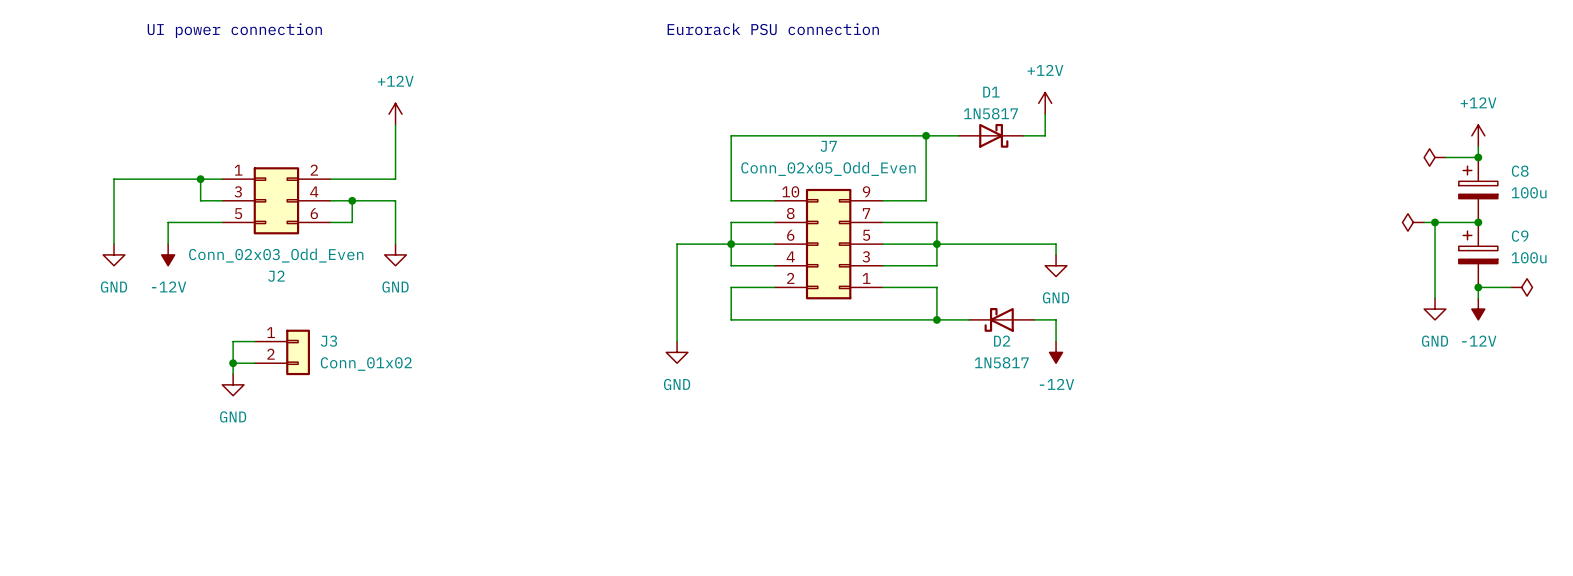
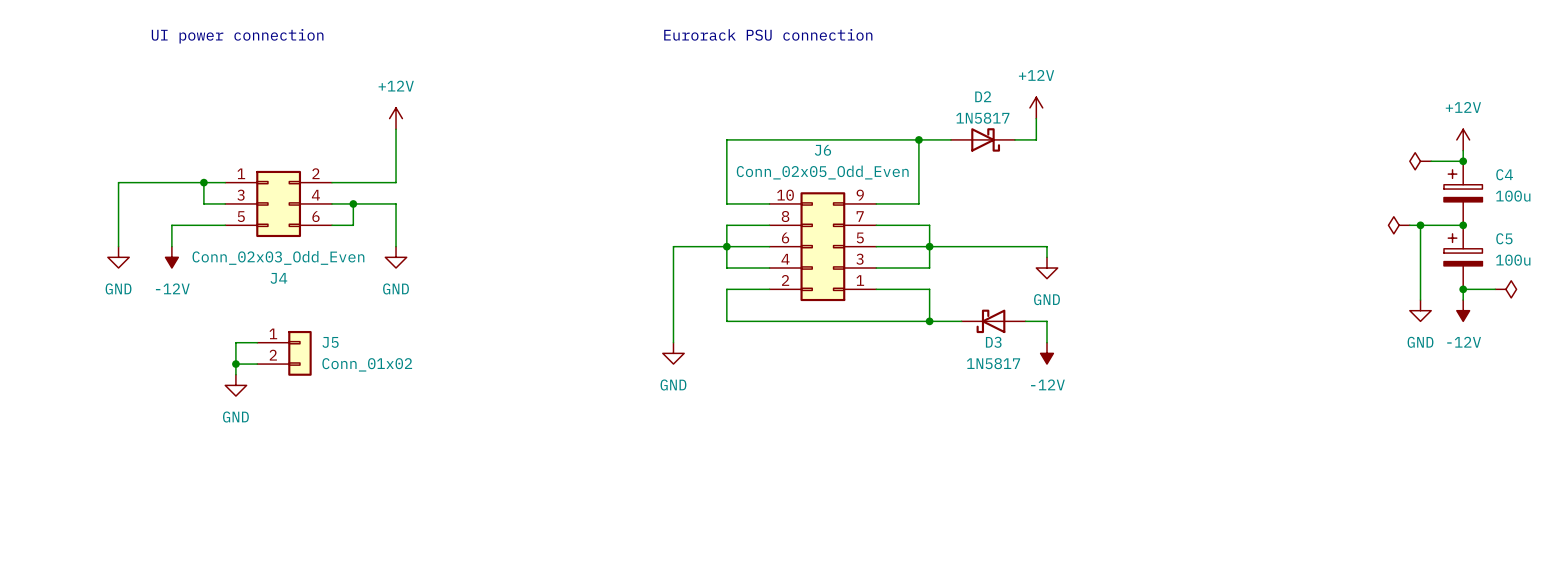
D1 name: D1 (991, 92) -> D2 (983, 96)
J7 name: J7 (828, 146) -> J6 (822, 150)
C8 name: C8 (1520, 171) -> C4 (1504, 174)
C9 name: C9 (1520, 236) -> C5 (1504, 238)
J2 name: J2 (276, 276) -> J4 (278, 278)
J3 name: J3 (328, 341) -> J5 (330, 342)
D2 name: D2 (1002, 341) -> D3 (993, 342)

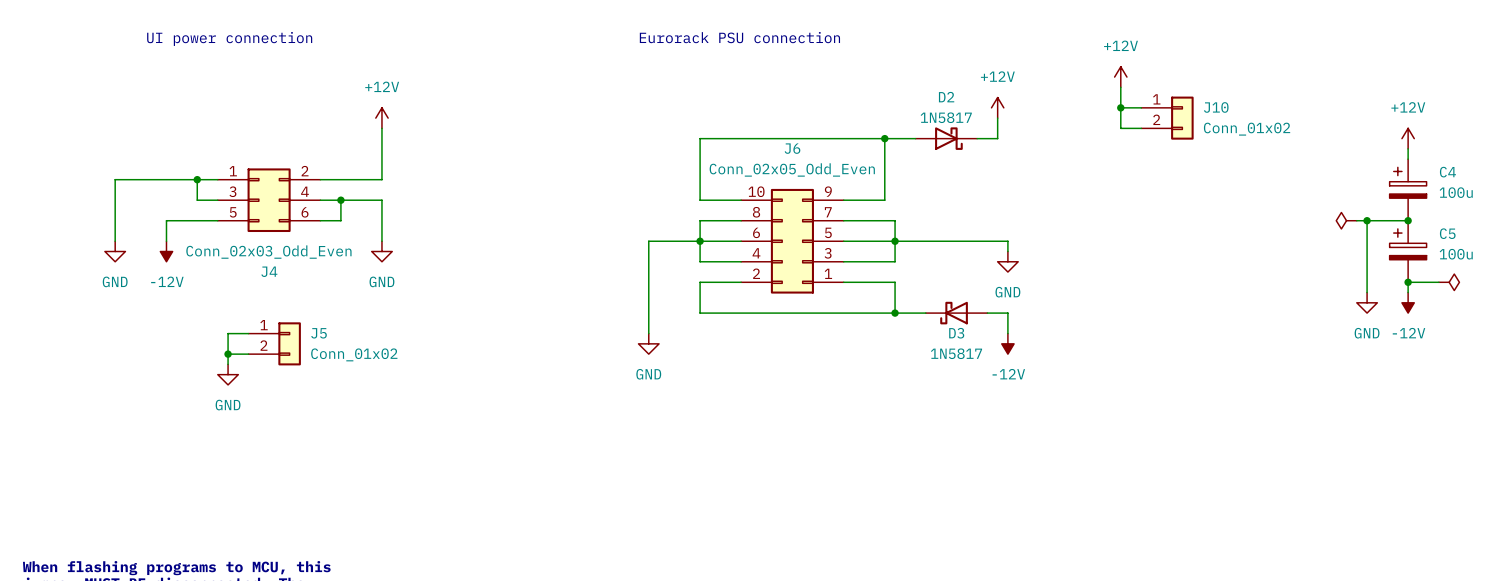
power symbol: none -> +12V (1120, 77)
wire: none -> (1120, 87) (1120, 128) (1141, 128)
wire: none -> (1120, 107) (1141, 107)
junction: none -> (1120, 107)
J10: none -> Conn_01x02 (1167, 118)
power symbol: (1420, 161) -> none
wire: (1431, 161) (1463, 161) -> none
junction: (1463, 161) -> none

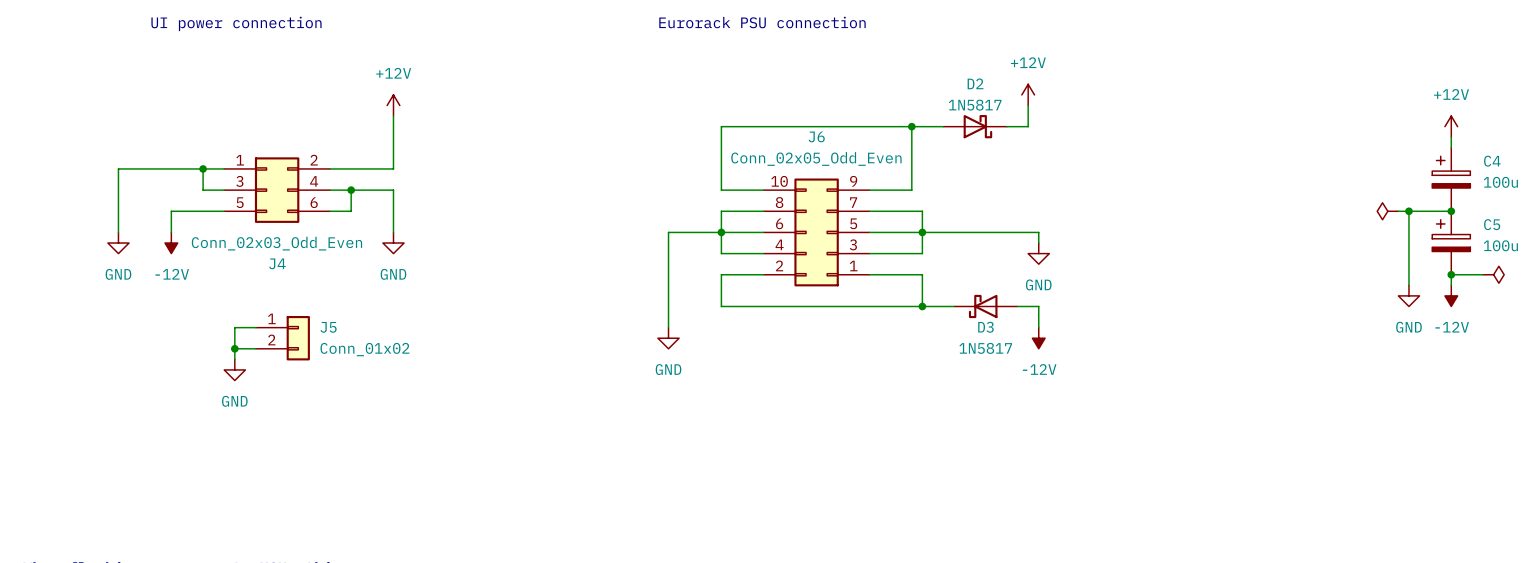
power symbol: +12V (1120, 77) -> none
wire: (1120, 87) (1120, 128) (1141, 128) -> none
wire: (1120, 107) (1141, 107) -> none
junction: (1120, 107) -> none
J10: Conn_01x02 (1167, 118) -> none

